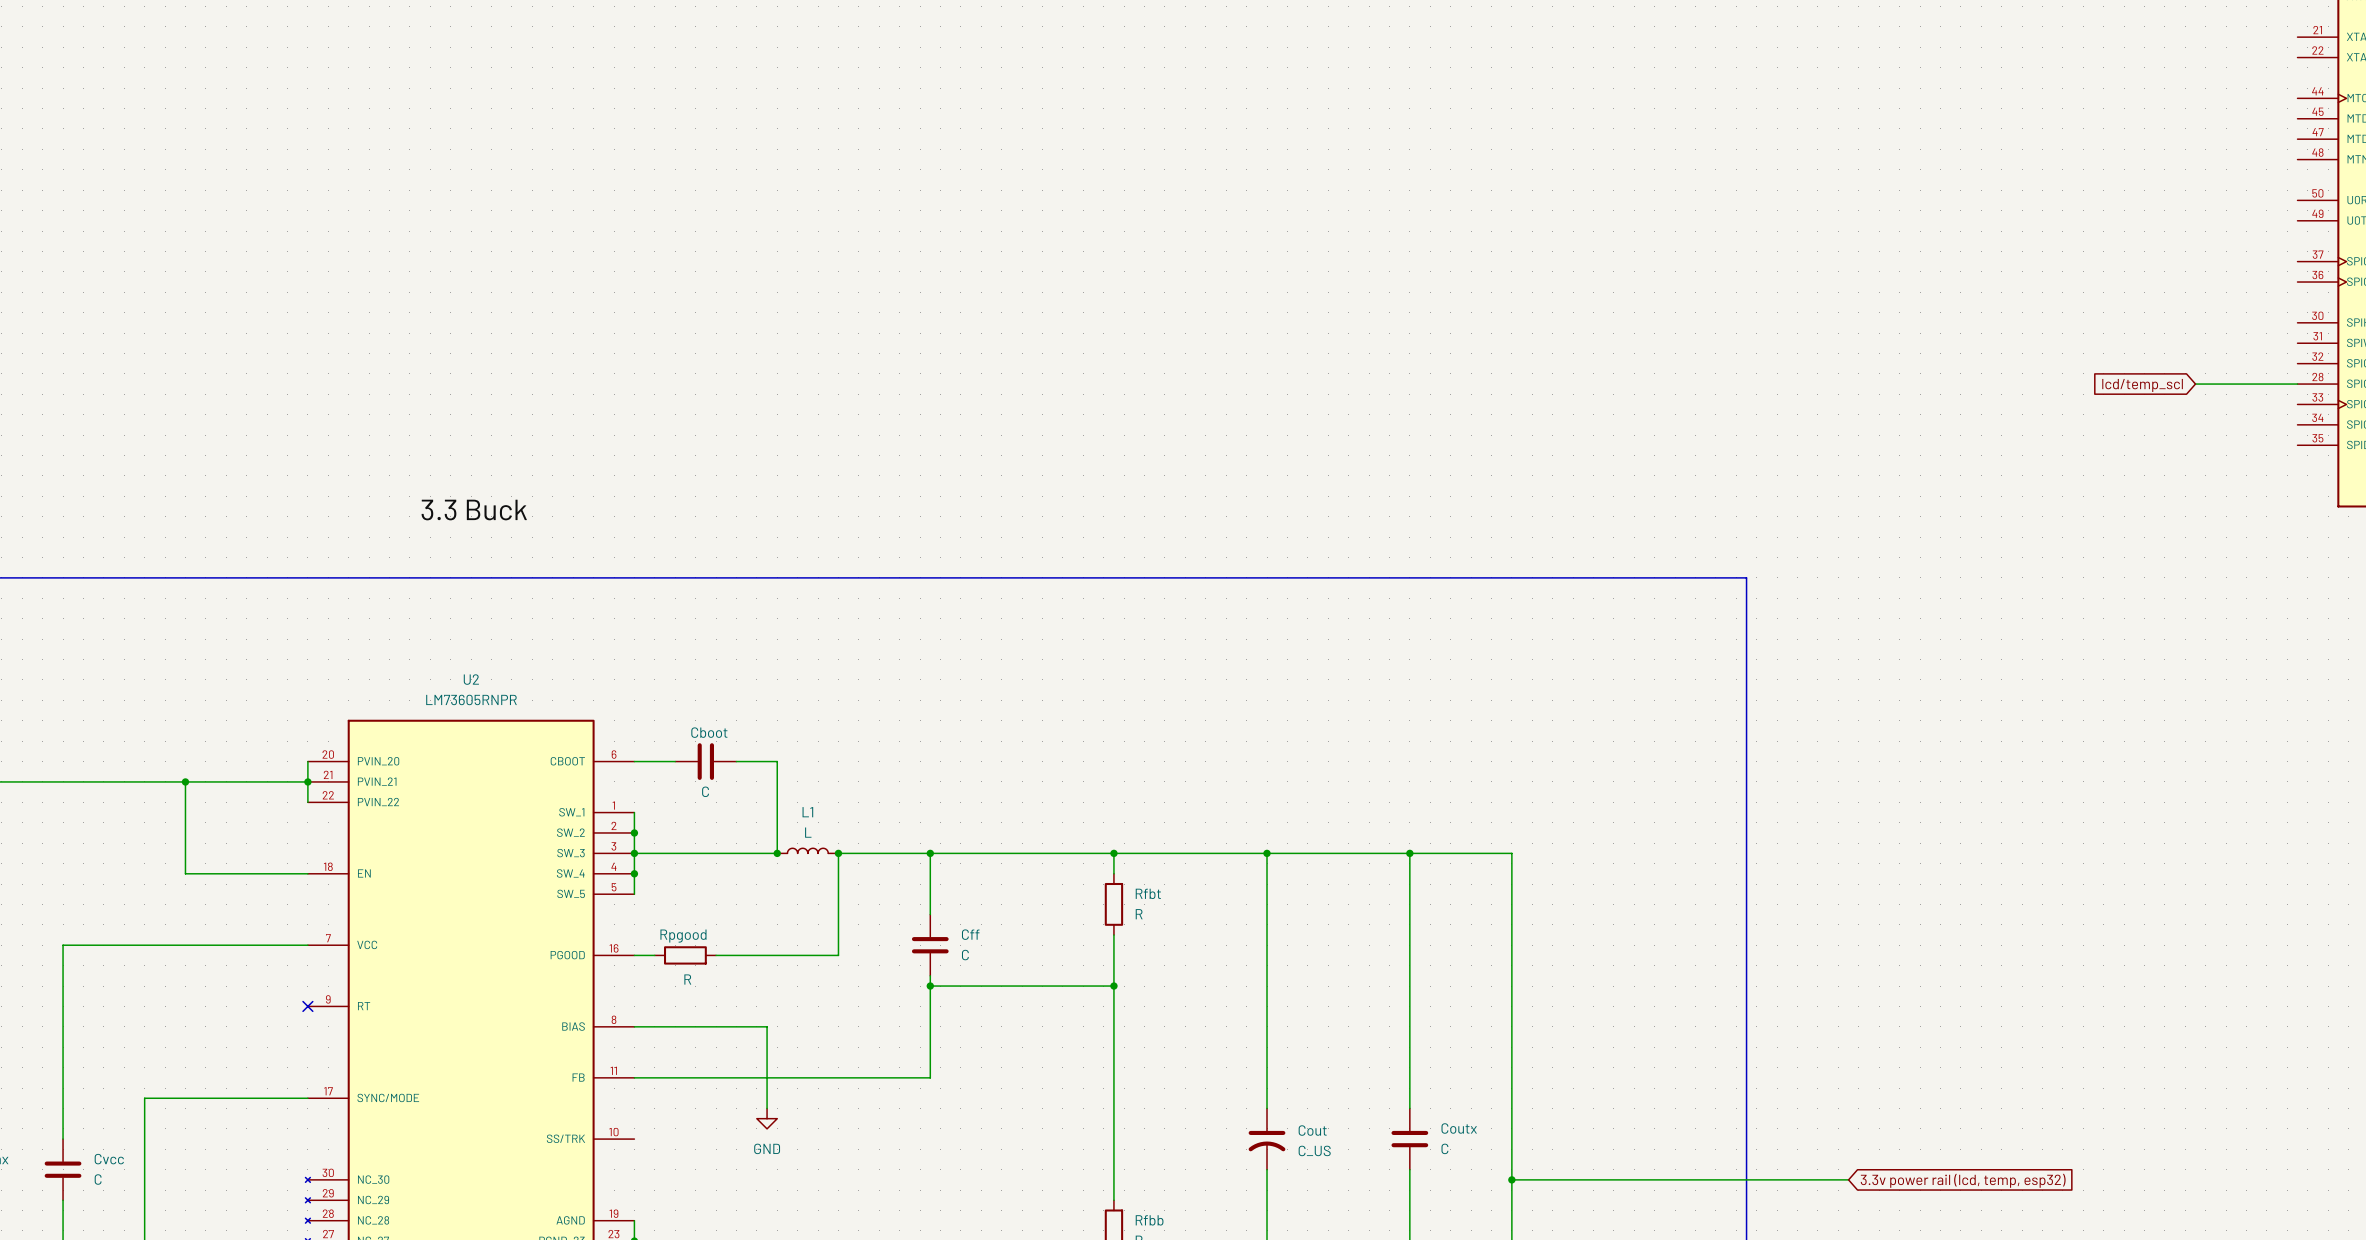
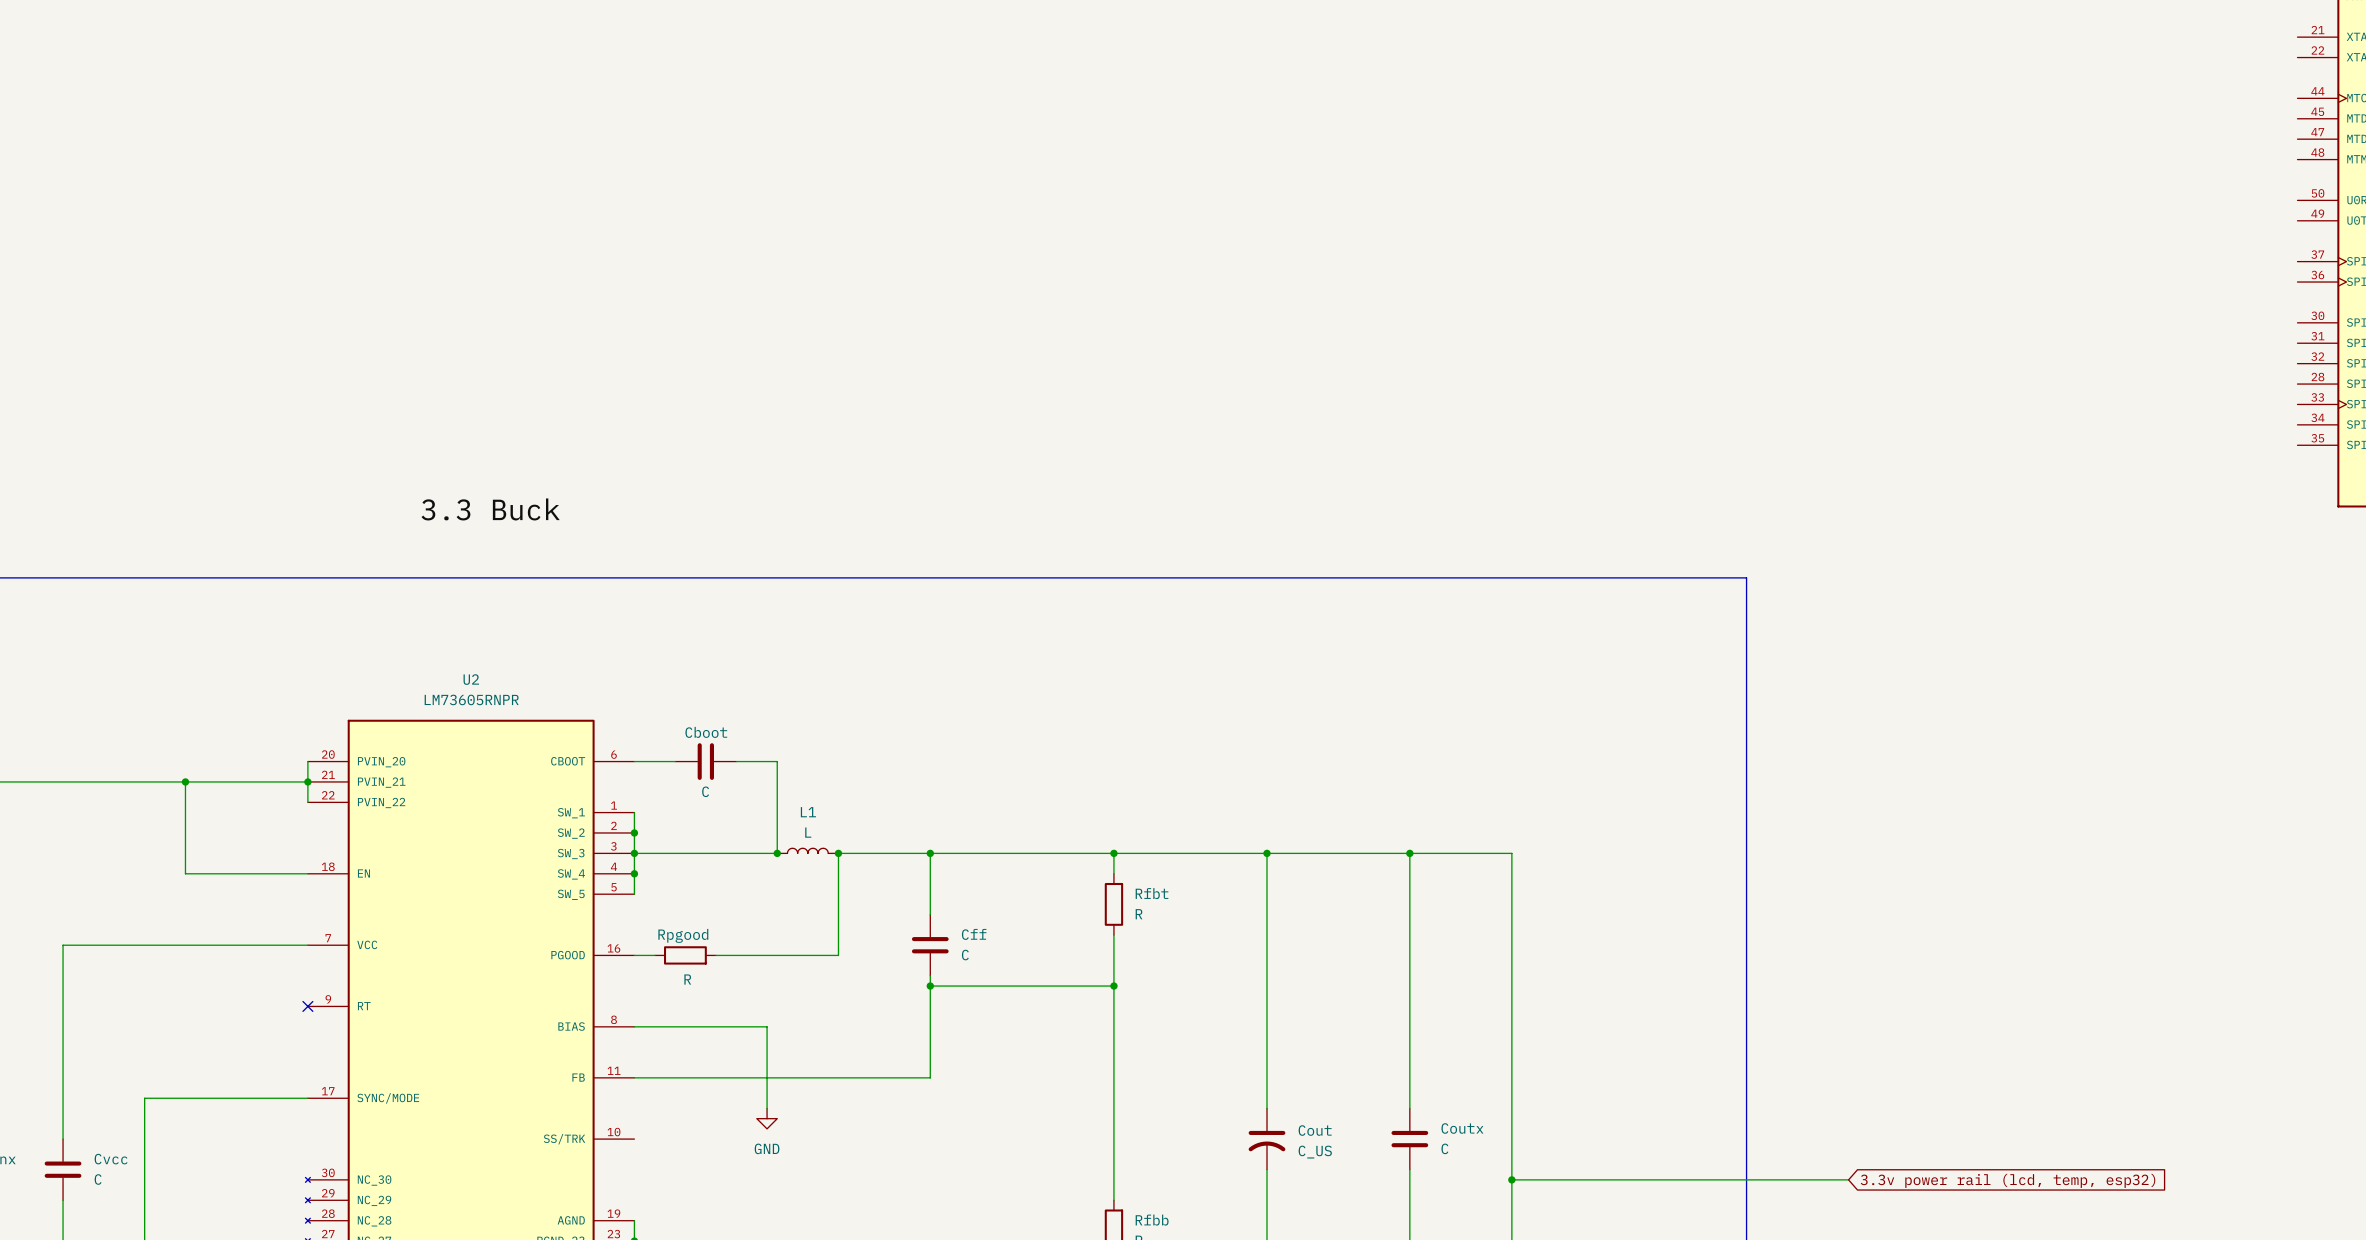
wire: (2195, 384) (2297, 384) -> none
global label: lcd/temp_scl (2142, 385) -> none

